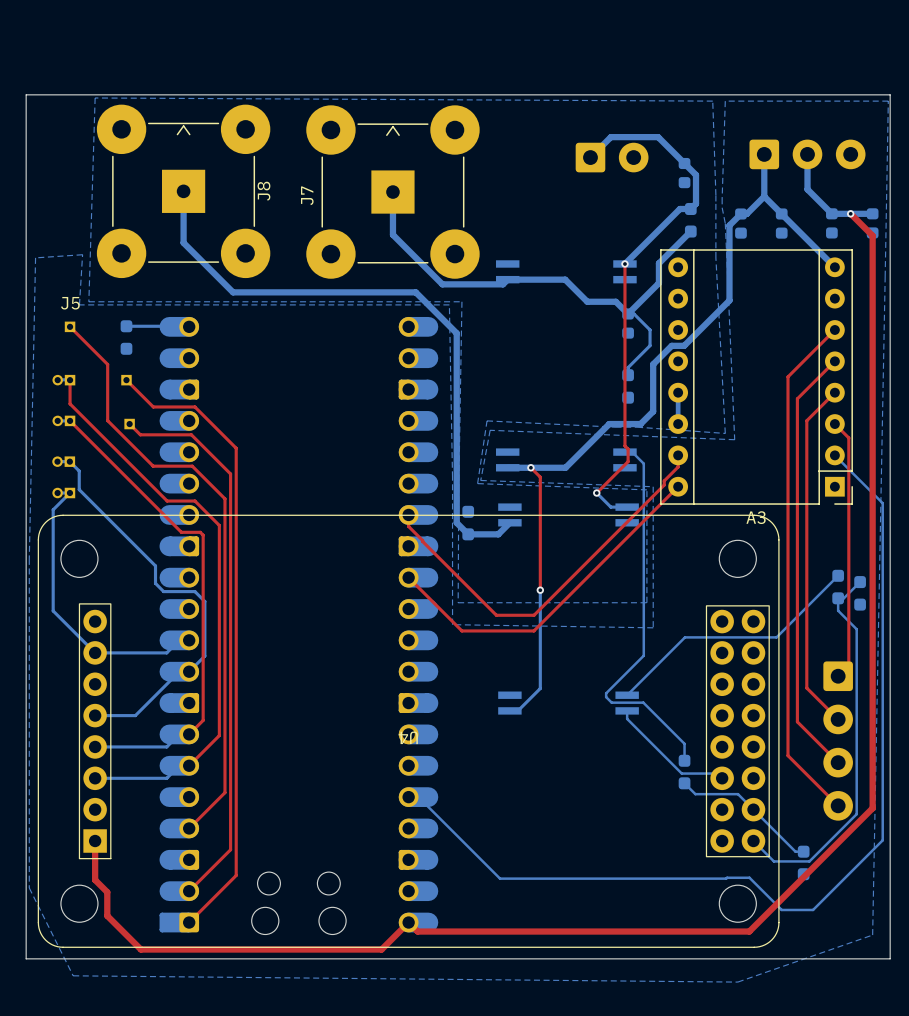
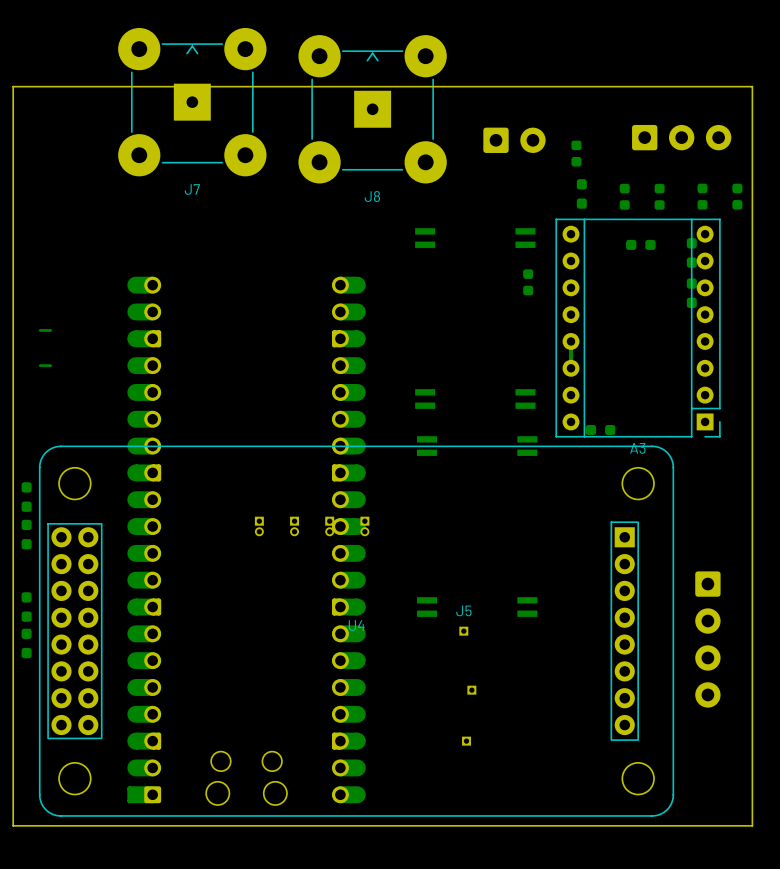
bottom zone outline: (95, 97) (712, 101) (715, 257) (725, 433) (637, 427) (487, 420) (477, 483) (646, 489) (646, 602) (458, 602) (461, 301) (88, 301) (95, 97) -> none
bottom zone outline: (725, 101) (888, 101) (872, 935) (737, 982) (73, 975) (29, 888) (29, 558) (35, 257) (82, 254) (79, 304) (449, 304) (452, 624) (653, 627) (653, 486) (480, 480) (490, 430) (734, 439) (725, 223) (722, 207) (725, 101) -> none
bottom track: (764, 154) (764, 196) -> none
bottom track: (807, 154) (807, 189) (831, 213) (872, 213) -> none
bottom track: (590, 157) (610, 137) (658, 137) (696, 174) (696, 203) (690, 208) (679, 208) (624, 263) -> none
bottom track: (183, 191) (183, 242) (233, 292) (415, 292) (456, 333) (456, 522) (468, 534) (498, 534) (509, 522) -> none
J8 position: (183, 191) -> (372, 109)
J8 name rotation: 0° (263, 191) -> 90° clockwise (372, 196)
J8 name position: J8 (263, 191) -> J8 (372, 196)
bottom track: (392, 192) (392, 234) (442, 284) (503, 284) (507, 279) (565, 279) (587, 301) (615, 301) (628, 313) -> none
J7 position: (392, 192) -> (192, 102)
J7 name rotation: 0° (307, 195) -> 90° clockwise (192, 189)
J7 name position: J7 (307, 195) -> J7 (192, 189)
bottom track: (764, 196) (781, 213) -> none
bottom track: (764, 196) (746, 213) (740, 213) (729, 225) (729, 300) (684, 345) (671, 345) (653, 364) (653, 411) (640, 424) (609, 424) (565, 467) (507, 467) -> none
top track: (850, 213) (872, 235) (872, 808) (749, 931) (417, 931) (408, 922) (381, 949) (140, 949) (107, 915) (107, 892) (95, 880) (95, 841) -> none
via: (850, 213) -> none
bottom track: (781, 214) (834, 267) -> none
bottom track: (690, 231) (658, 263) (658, 283) (628, 313) -> none
top track: (624, 263) (624, 445) (628, 449) (628, 461) (596, 493) -> none
via: (624, 263) -> none
part: none -> (640, 244)
part: none -> (691, 252)
bottom track: (628, 313) (634, 313) (650, 329) (650, 345) (628, 367) (628, 375) -> none
top track: (70, 326) (107, 364) (107, 420) (153, 466) (192, 466) (224, 498) (224, 792) (189, 828) -> none
J5 position: (70, 326) -> (463, 631)
bottom track: (126, 326) (179, 326) -> none
top track: (834, 329) (787, 376) (787, 755) (838, 805) -> none
part: none -> (691, 293)
part: (126, 337) -> none
top track: (834, 361) (797, 398) (797, 721) (838, 762) -> none
part: (63, 380) -> none
top track: (70, 380) (70, 403) (167, 501) (194, 501) (219, 525) (219, 735) (189, 765) -> none
top track: (126, 380) (153, 406) (194, 406) (236, 448) (236, 875) (189, 922) -> none
part: (126, 380) -> none
part: (628, 386) -> none
top track: (834, 392) (806, 420) (806, 688) (838, 719) -> none
part: (63, 420) -> none
top track: (70, 420) (181, 532) (200, 532) (203, 535) (203, 720) (189, 734) -> none
top track: (129, 424) (140, 434) (191, 434) (230, 473) (230, 849) (189, 891) -> none
part: (129, 424) -> none
top track: (834, 424) (848, 437) (848, 665) (838, 676) -> none
bottom track: (624, 452) (632, 452) (643, 463) (643, 655) (606, 693) (606, 697) (611, 702) (643, 702) (684, 743) (684, 760) -> none
top track: (678, 455) (678, 467) (664, 480) (664, 485) (534, 615) (496, 615) (408, 526) (408, 514) -> none
bottom track: (834, 455) (882, 503) (882, 840) (813, 909) (781, 909) (749, 877) (500, 878) (418, 797) -> none
bottom track: (57, 461) (69, 461) (79, 471) (79, 489) (155, 565) (155, 583) (163, 591) (194, 591) (204, 601) (204, 656) (189, 671) -> none
part: (63, 461) -> none
top track: (530, 467) (540, 477) (540, 590) -> none
via: (530, 467) -> none
top track: (678, 486) (533, 630) (461, 630) (408, 577) -> none
bottom track: (57, 493) (69, 493) (53, 509) (53, 610) (95, 652) (166, 652) (179, 640) -> none
part: (63, 493) -> none
bottom track: (596, 493) (610, 507) (627, 507) -> none
via: (596, 493) -> none
part: none -> (600, 429)
part: (468, 523) -> none
part: none -> (26, 497)
bottom track: (838, 575) (776, 637) (684, 637) (627, 695) -> none
bottom track: (860, 582) (843, 598) (838, 598) (838, 610) (856, 629) (856, 814) (809, 861) (773, 861) (753, 841) -> none
part: (838, 587) -> none
bottom track: (540, 590) (540, 688) (517, 710) (509, 710) -> none
via: (540, 590) -> none
part: (860, 593) -> none
part: none -> (259, 526)
part: none -> (294, 526)
part: none -> (329, 526)
part: none -> (364, 526)
part: none -> (26, 534)
bottom track: (179, 671) (135, 715) (95, 715) -> none
part: none -> (26, 607)
bottom track: (627, 710) (627, 718) (681, 773) (717, 773) (722, 778) -> none
U4 rotation: 0° (408, 731) -> 180° (356, 631)
bottom track: (179, 734) (166, 746) (95, 746) -> none
part: none -> (26, 643)
bottom track: (179, 765) (166, 778) (95, 778) -> none
part: (684, 772) -> none
bottom track: (684, 783) (695, 794) (738, 794) (795, 851) (803, 851) -> none
part: none -> (471, 690)
part: none -> (466, 741)
part: (803, 862) -> none

